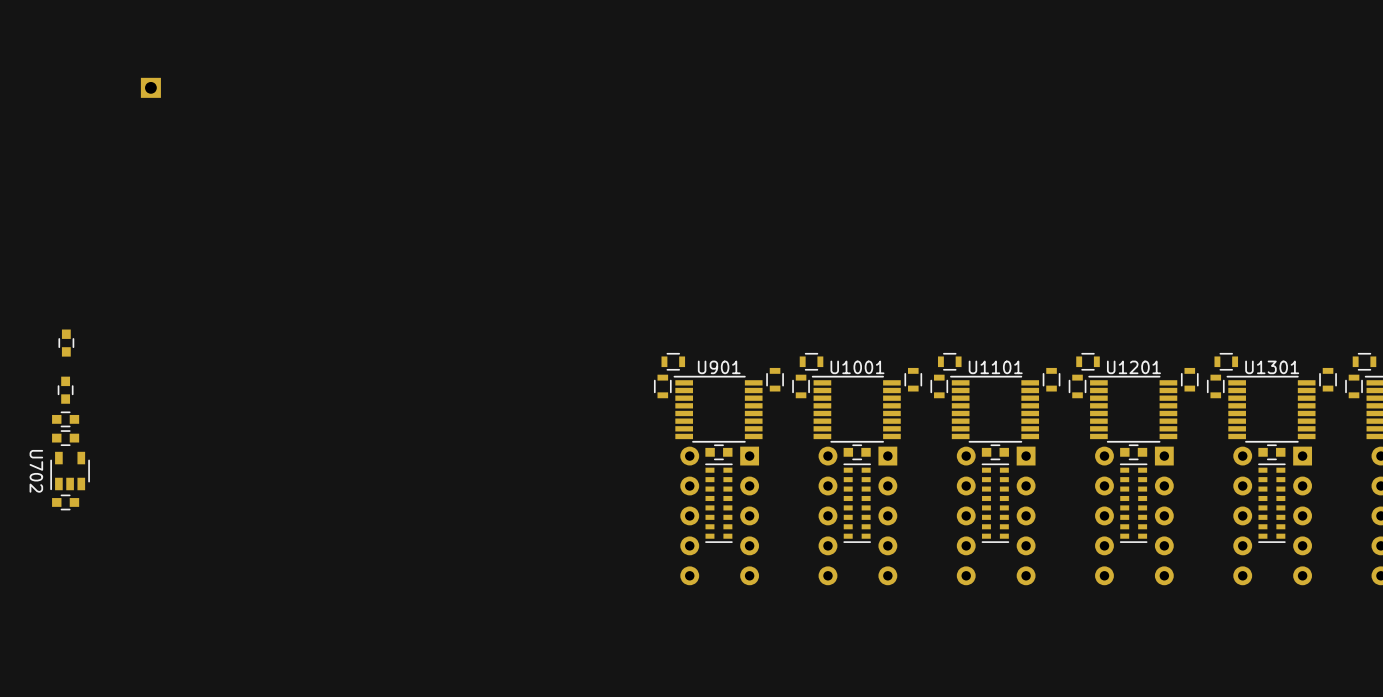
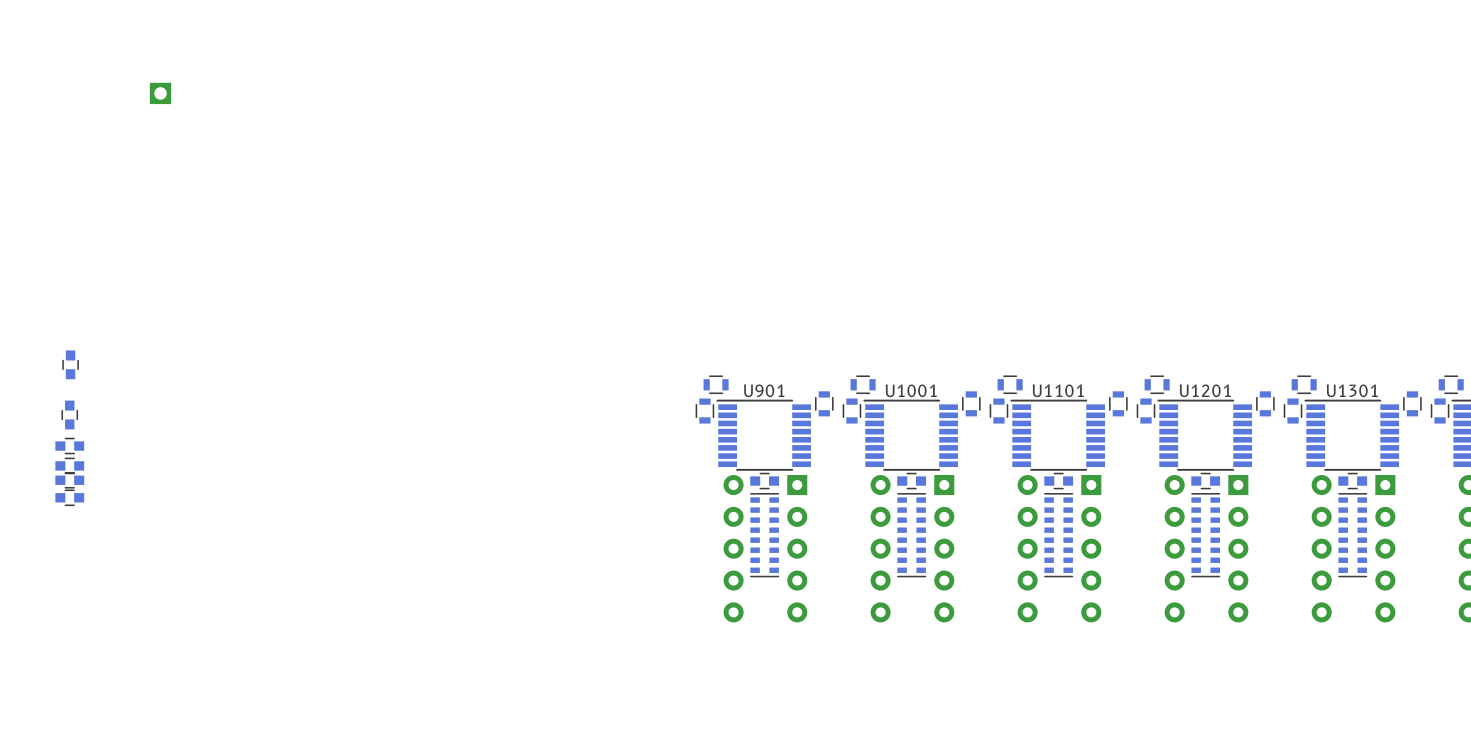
part: none -> (69, 480)
part: none -> (69, 497)
U702: (70, 471) -> none
part: (65, 502) -> none

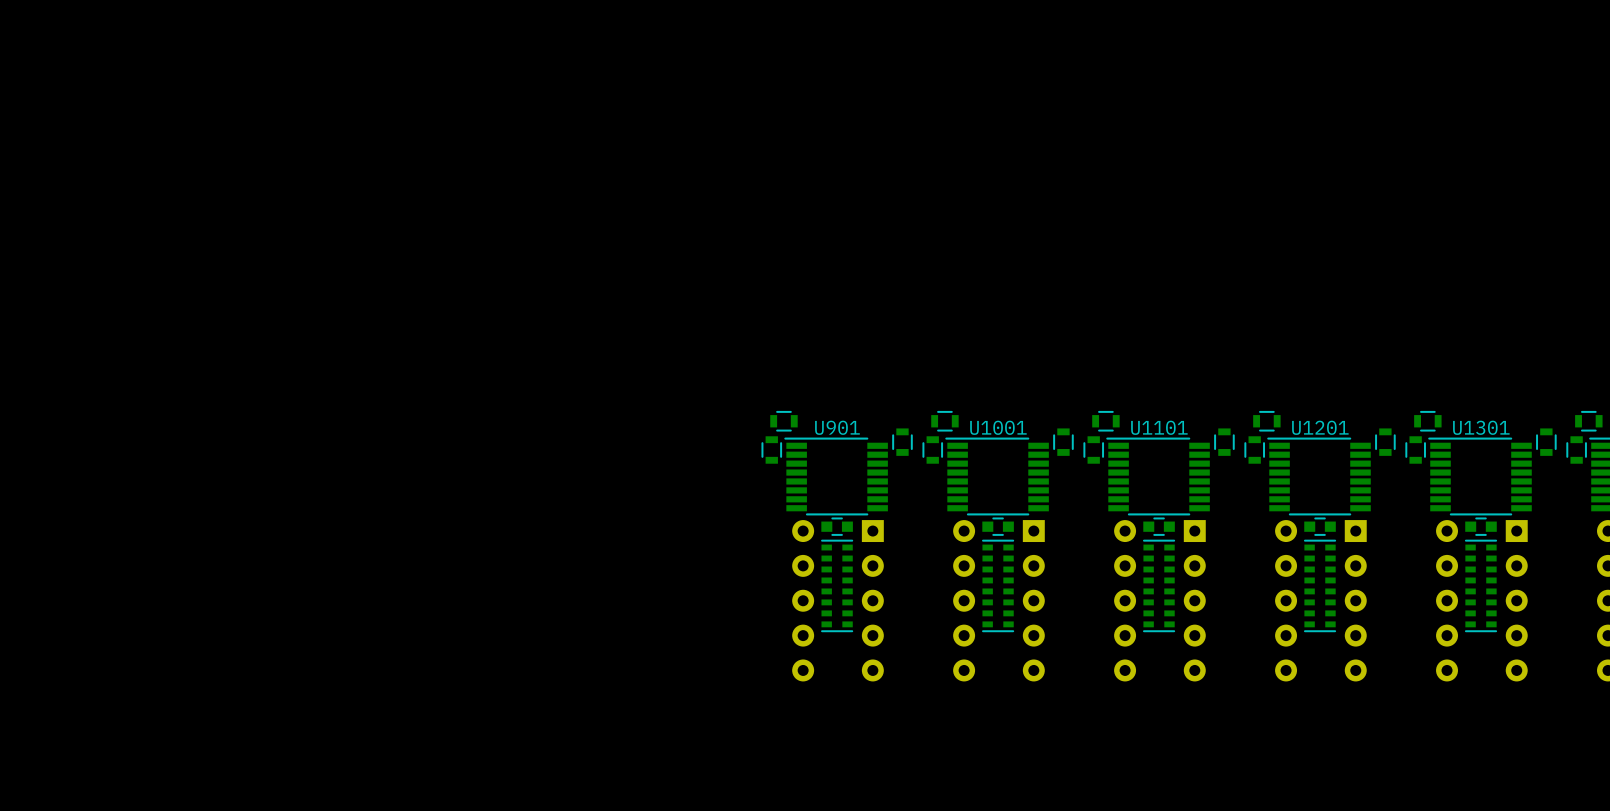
part: (160, 93) -> none
part: (70, 364) -> none
part: (69, 415) -> none
part: (69, 446) -> none
part: (69, 465) -> none
part: (69, 480) -> none
part: (69, 497) -> none

